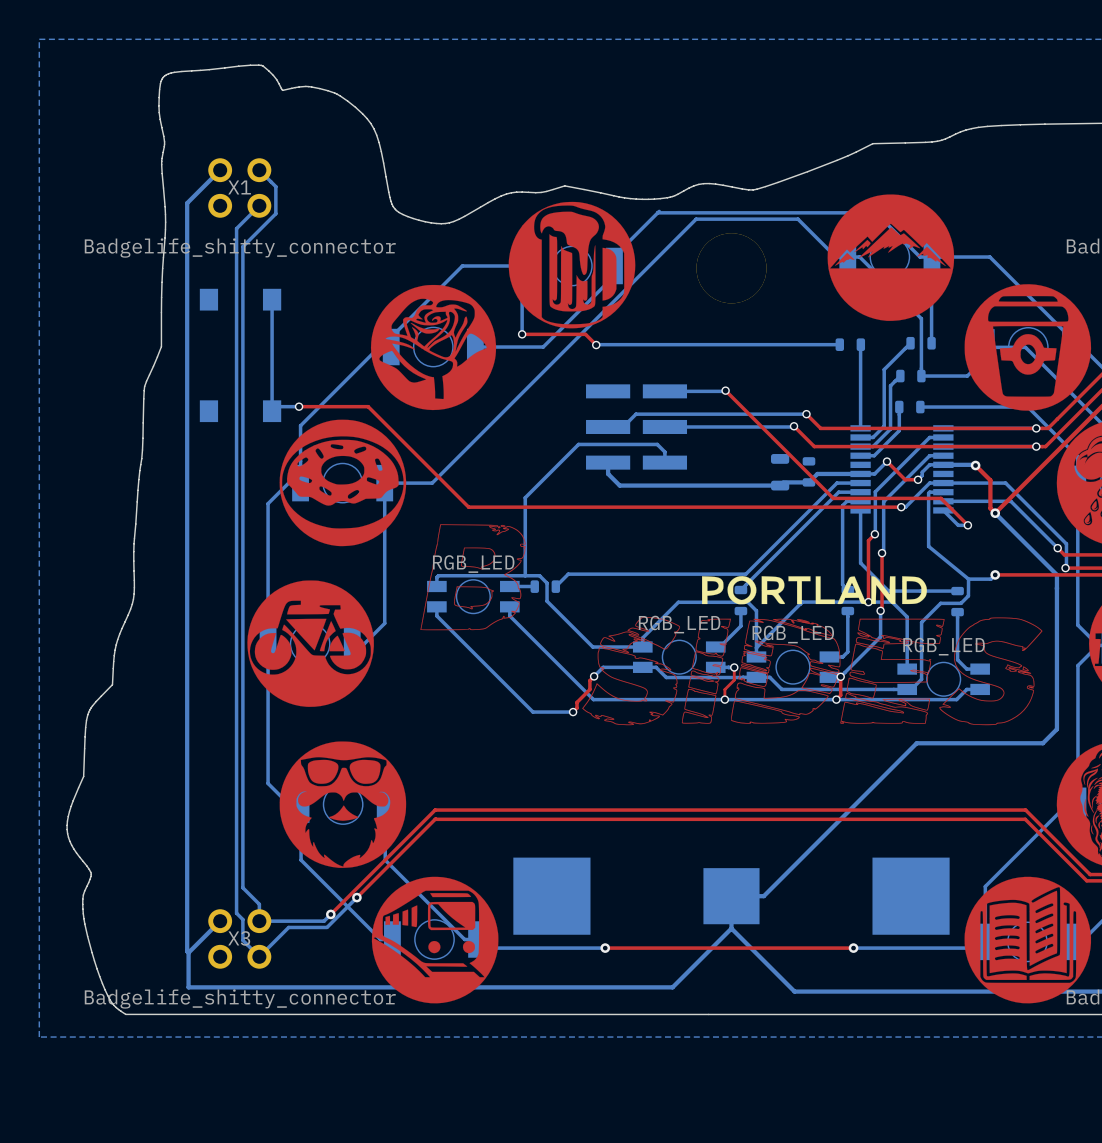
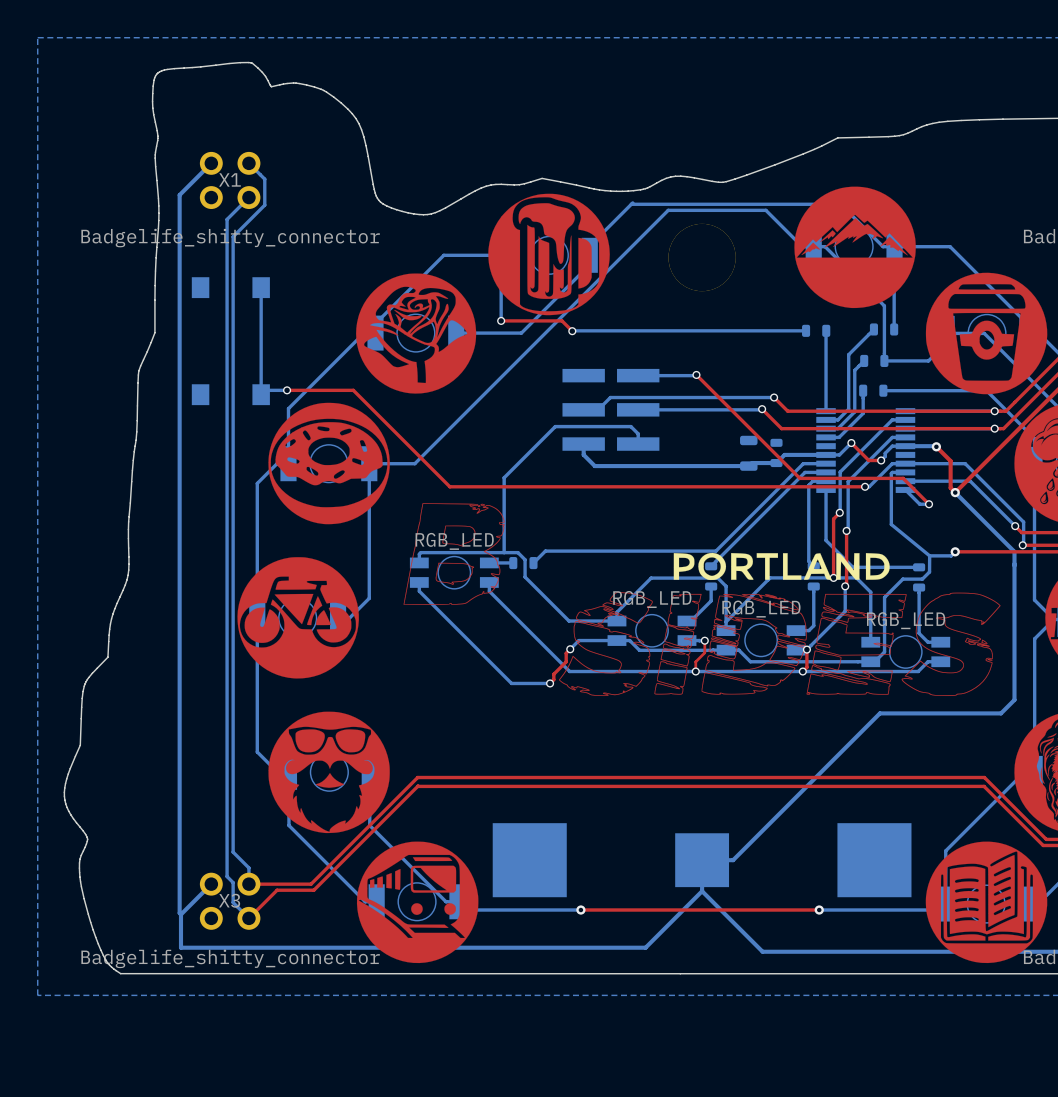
bottom track: (356, 897) (327, 927) -> none
top track: none -> (342, 861) (313, 890) (277, 890) (248, 918)
via: (356, 897) -> none
bottom track: (330, 914) (324, 921) (259, 921) -> none
top track: none -> (317, 877) (311, 884) (248, 884)
via: (330, 914) -> none
bottom track: (327, 927) (288, 927) (259, 956) -> none

